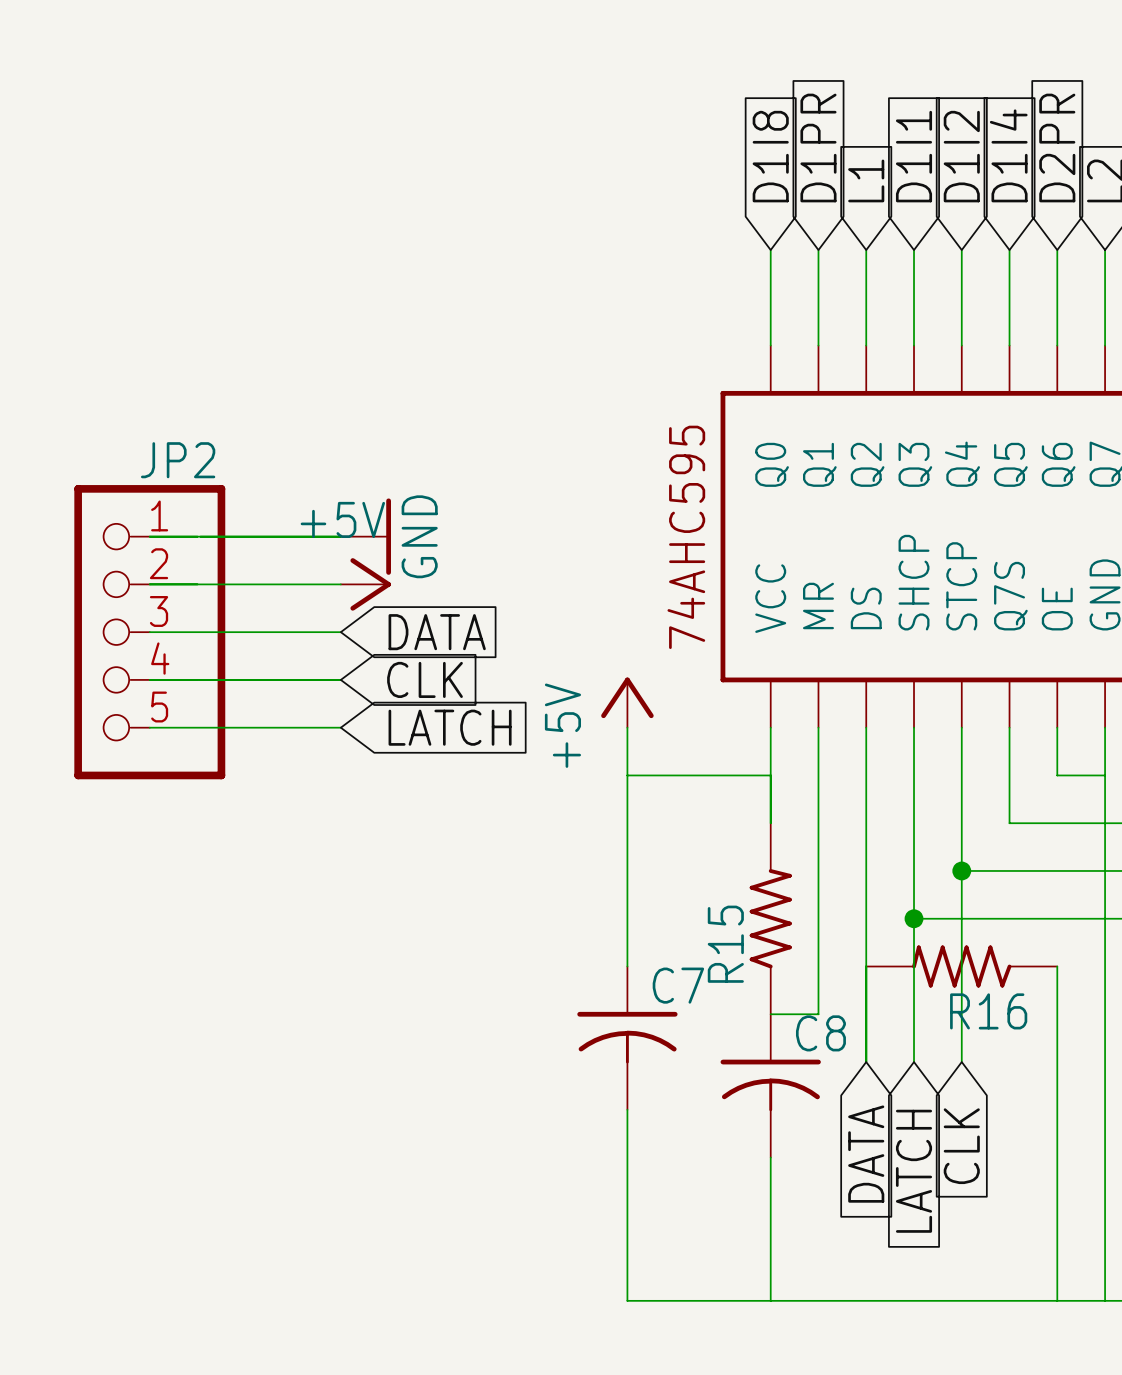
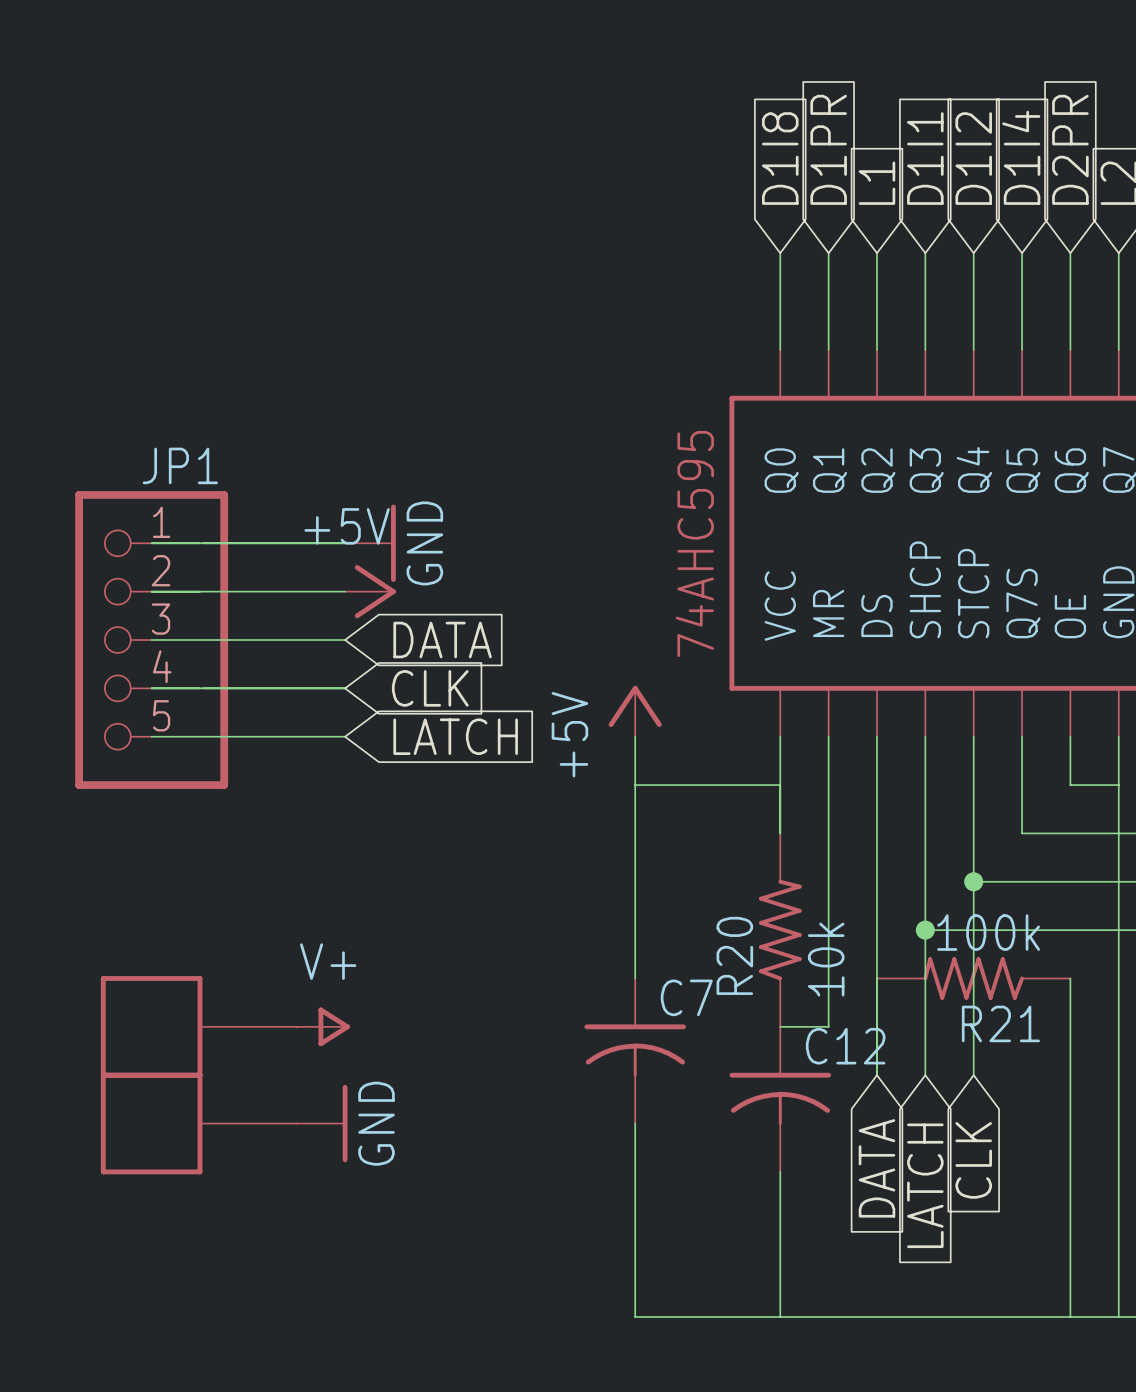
JP2 name: JP2 (178, 460) -> JP1 (180, 465)
R16 value: none -> 100k (988, 932)
R15 name: R15 (725, 944) -> R20 (734, 955)
R15 value: none -> 10k (826, 959)
R16 name: R16 (988, 1011) -> R21 (1000, 1023)
part: none -> (198, 1026)
power symbol: none -> V+ (323, 1026)
C8 name: C8 (820, 1033) -> C12 (845, 1046)
part: none -> (198, 1123)
power symbol: none -> GND (322, 1123)

